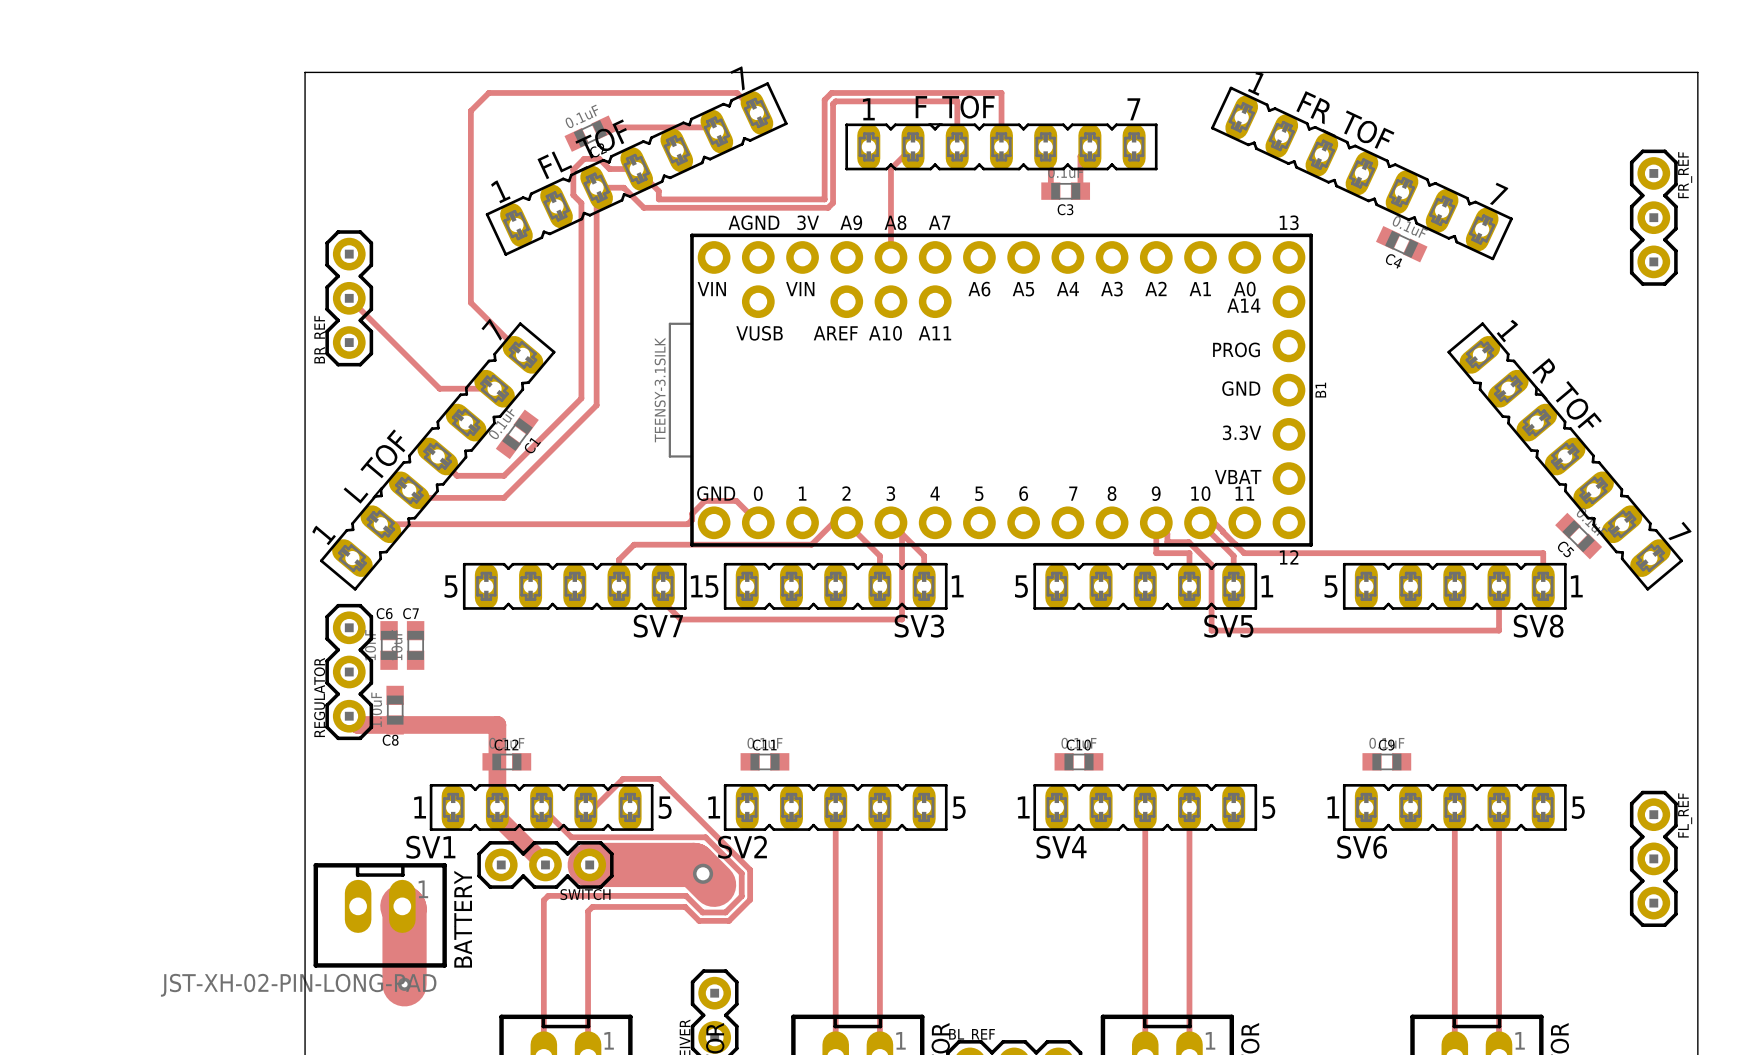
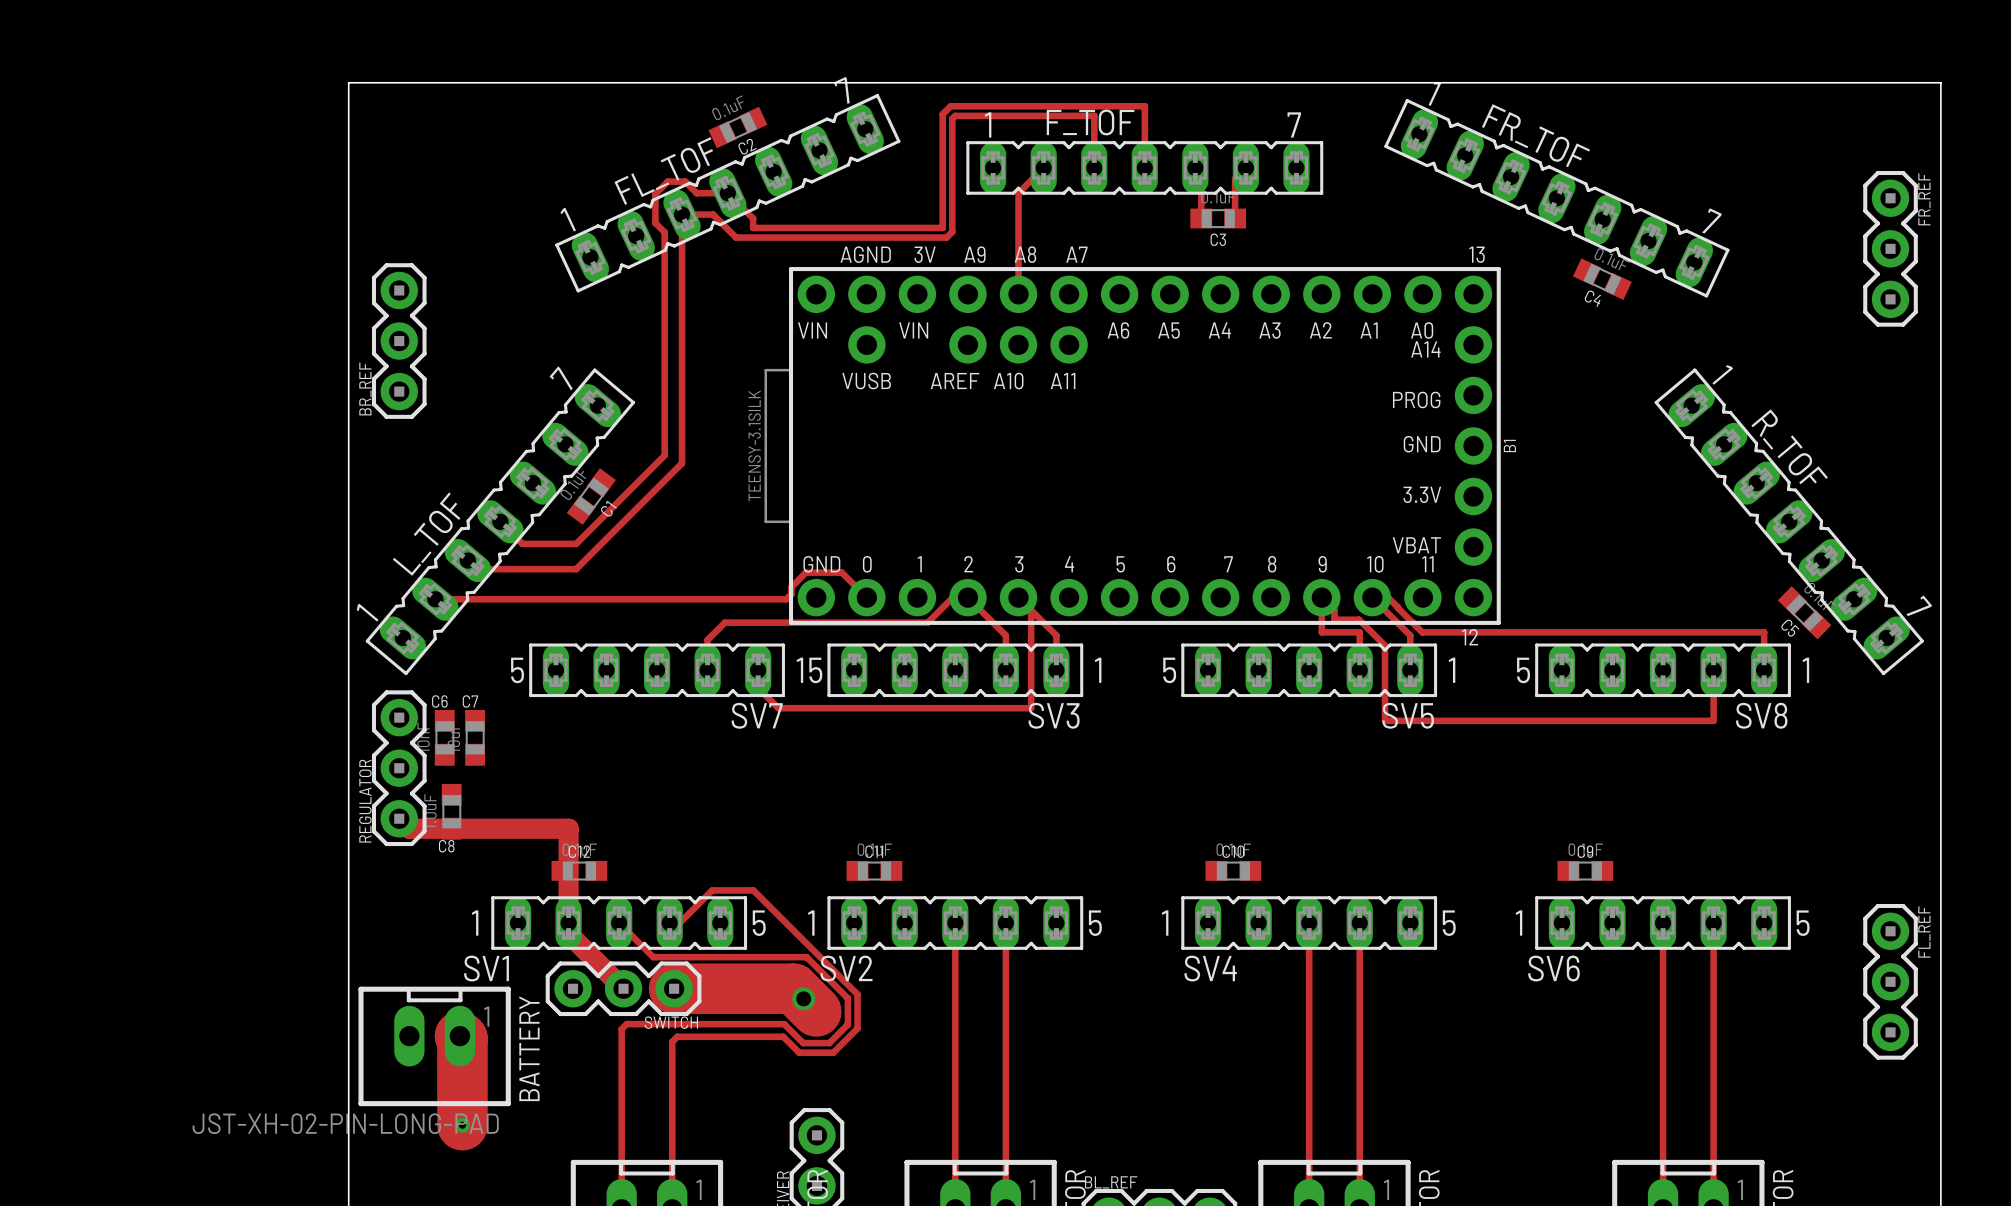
track: (756, 112) (736, 92) (488, 92) (470, 110) (470, 302) (522, 354) -> none
track: (603, 127) (712, 127) (716, 131) -> none
C2 position: (590, 133) -> (737, 127)
track: (349, 298) (439, 388) (494, 388) -> none

